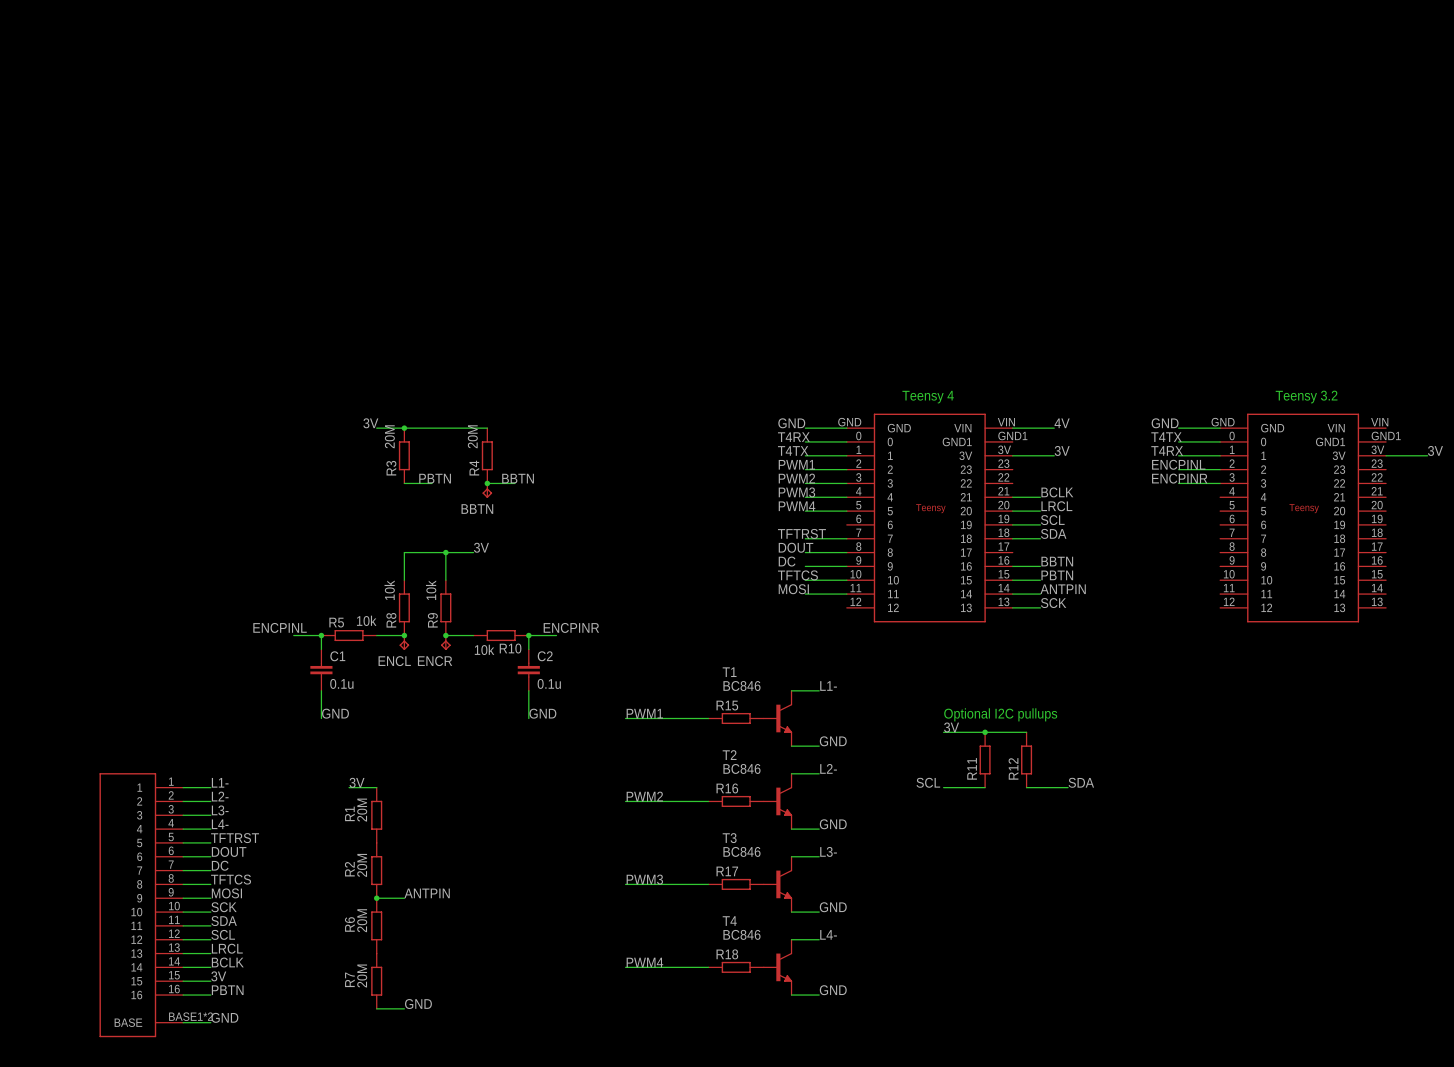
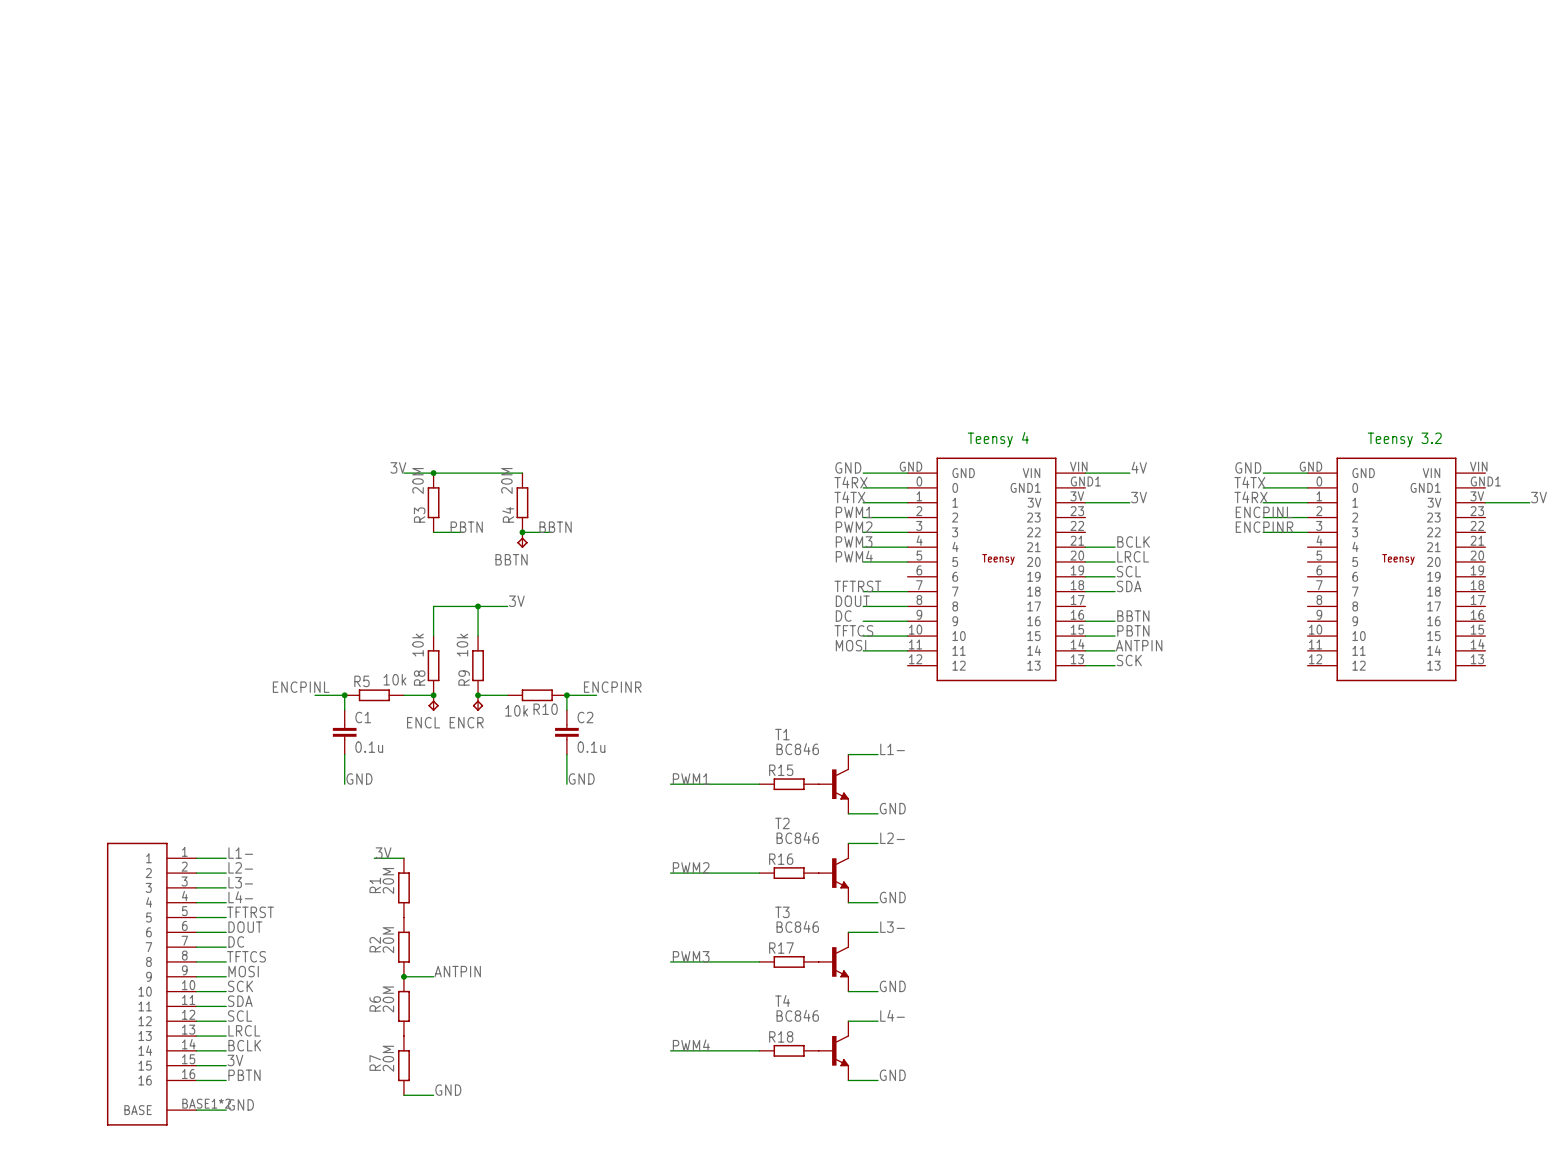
text: Optional I2C pullups (1000, 714) -> none
label: 3V (951, 727) -> none
wire: (943, 732) (1026, 732) -> none
junction: (985, 732) -> none
R11: (985, 759) -> none
R12: (1026, 759) -> none
label: SCL (928, 782) -> none
label: SDA (1081, 782) -> none
wire: (943, 787) (985, 787) -> none
wire: (1026, 787) (1068, 787) -> none

